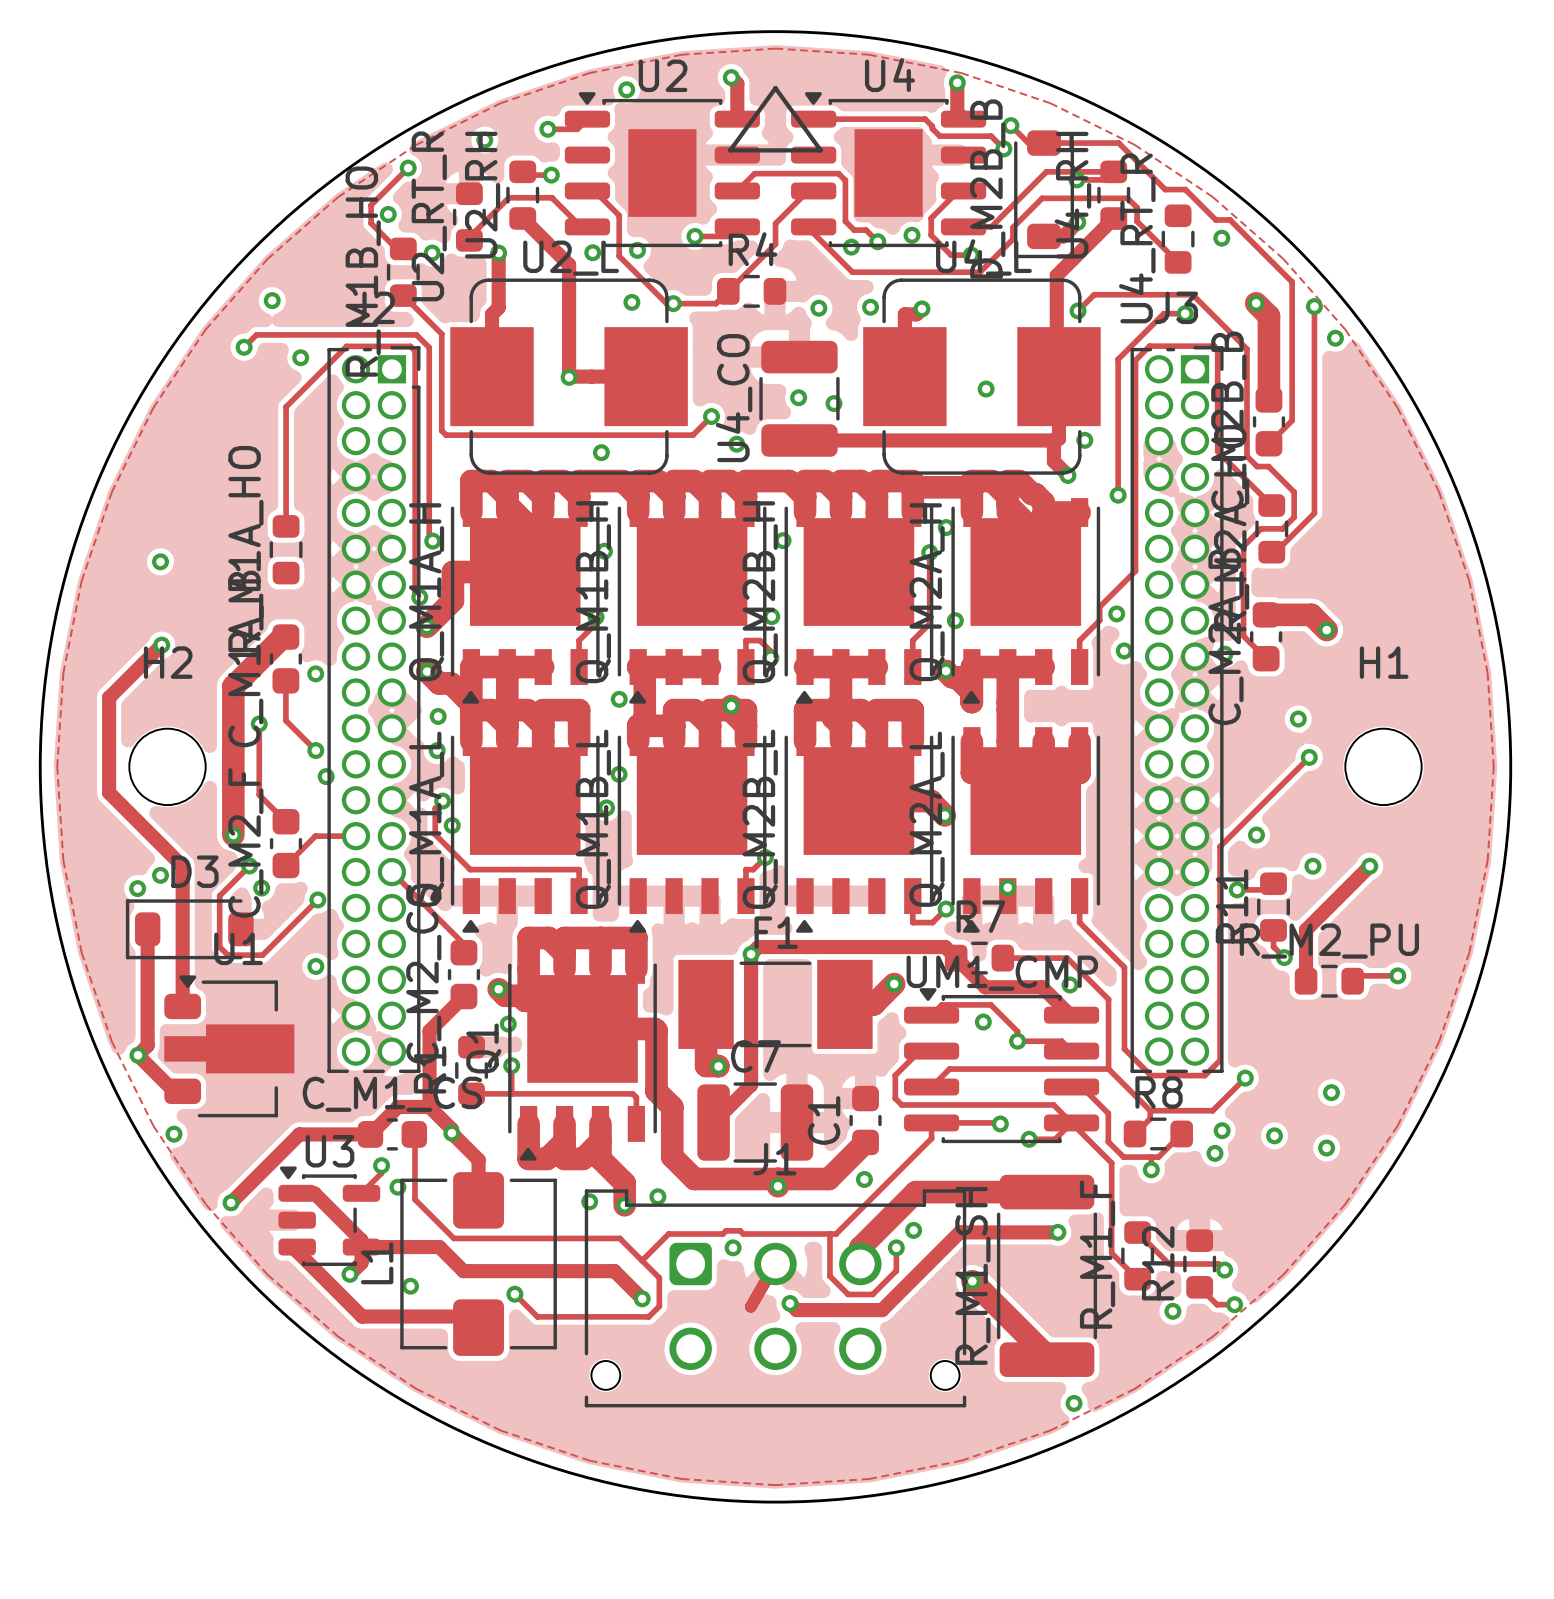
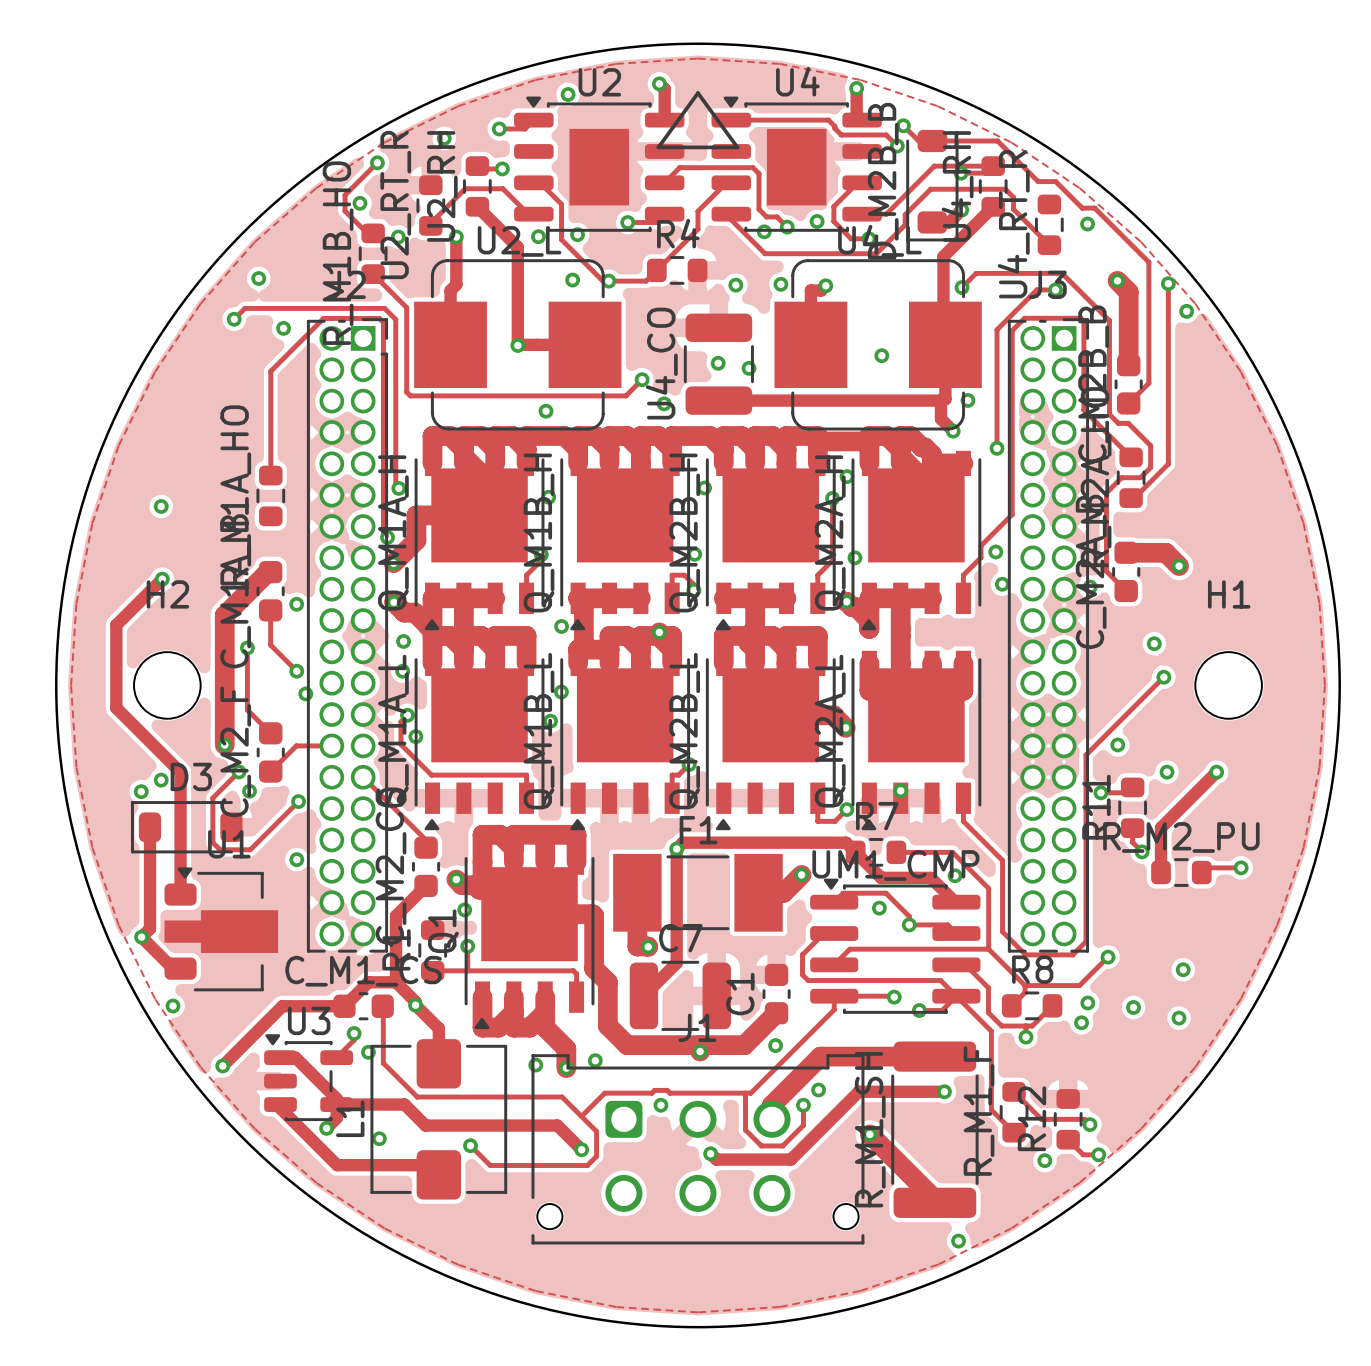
track: (775, 1264) (750, 1306) -> none

